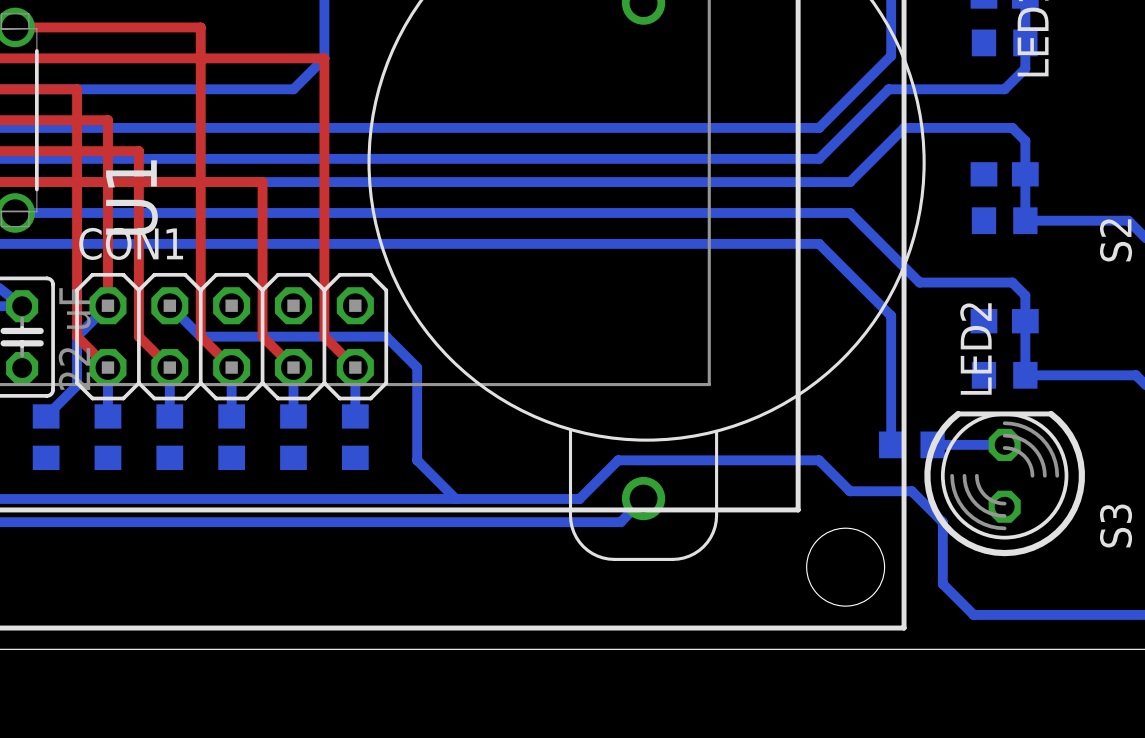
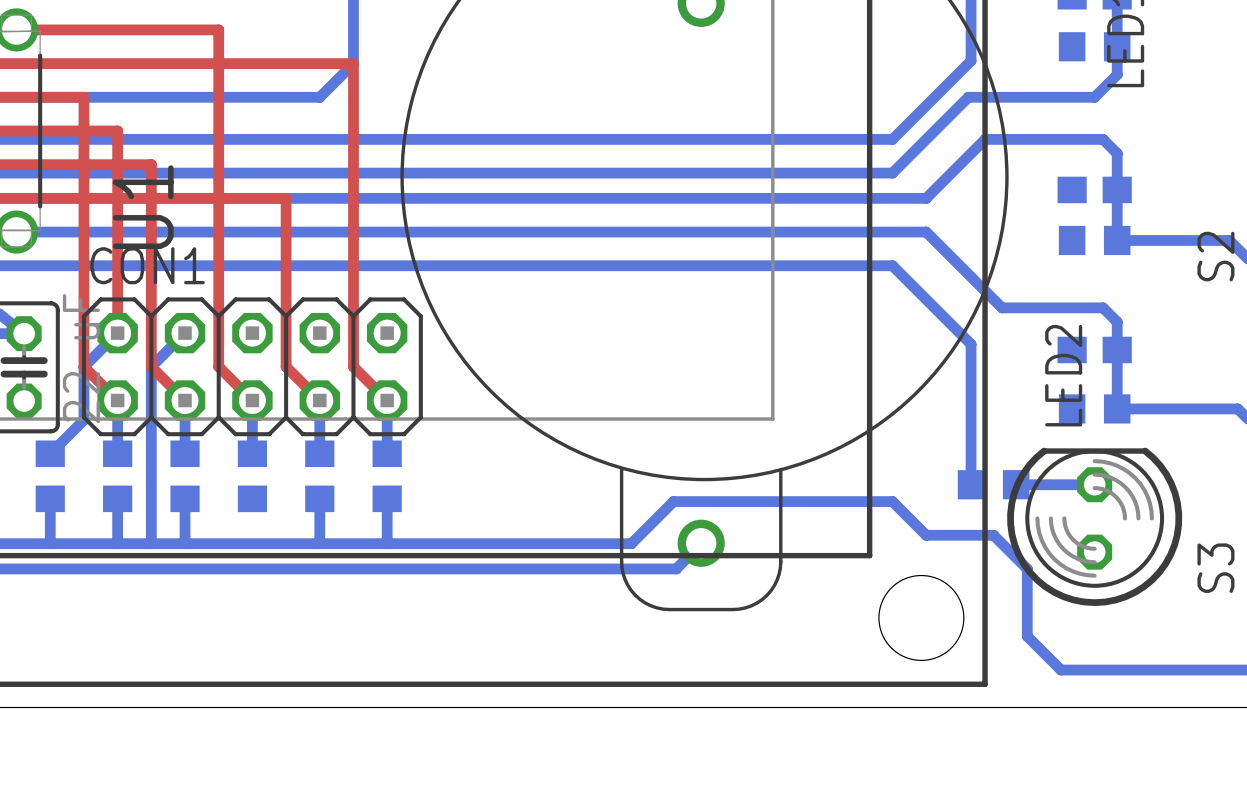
bottom track: (169, 305) (200, 336) (386, 336) (417, 367) (417, 460) (455, 498) -> (185, 333) (151, 366) (151, 543)
bottom track: none -> (50, 498) (50, 543)
bottom track: none -> (117, 498) (117, 543)
bottom track: none -> (185, 498) (185, 543)
bottom track: none -> (319, 498) (319, 543)
bottom track: none -> (387, 498) (387, 543)

